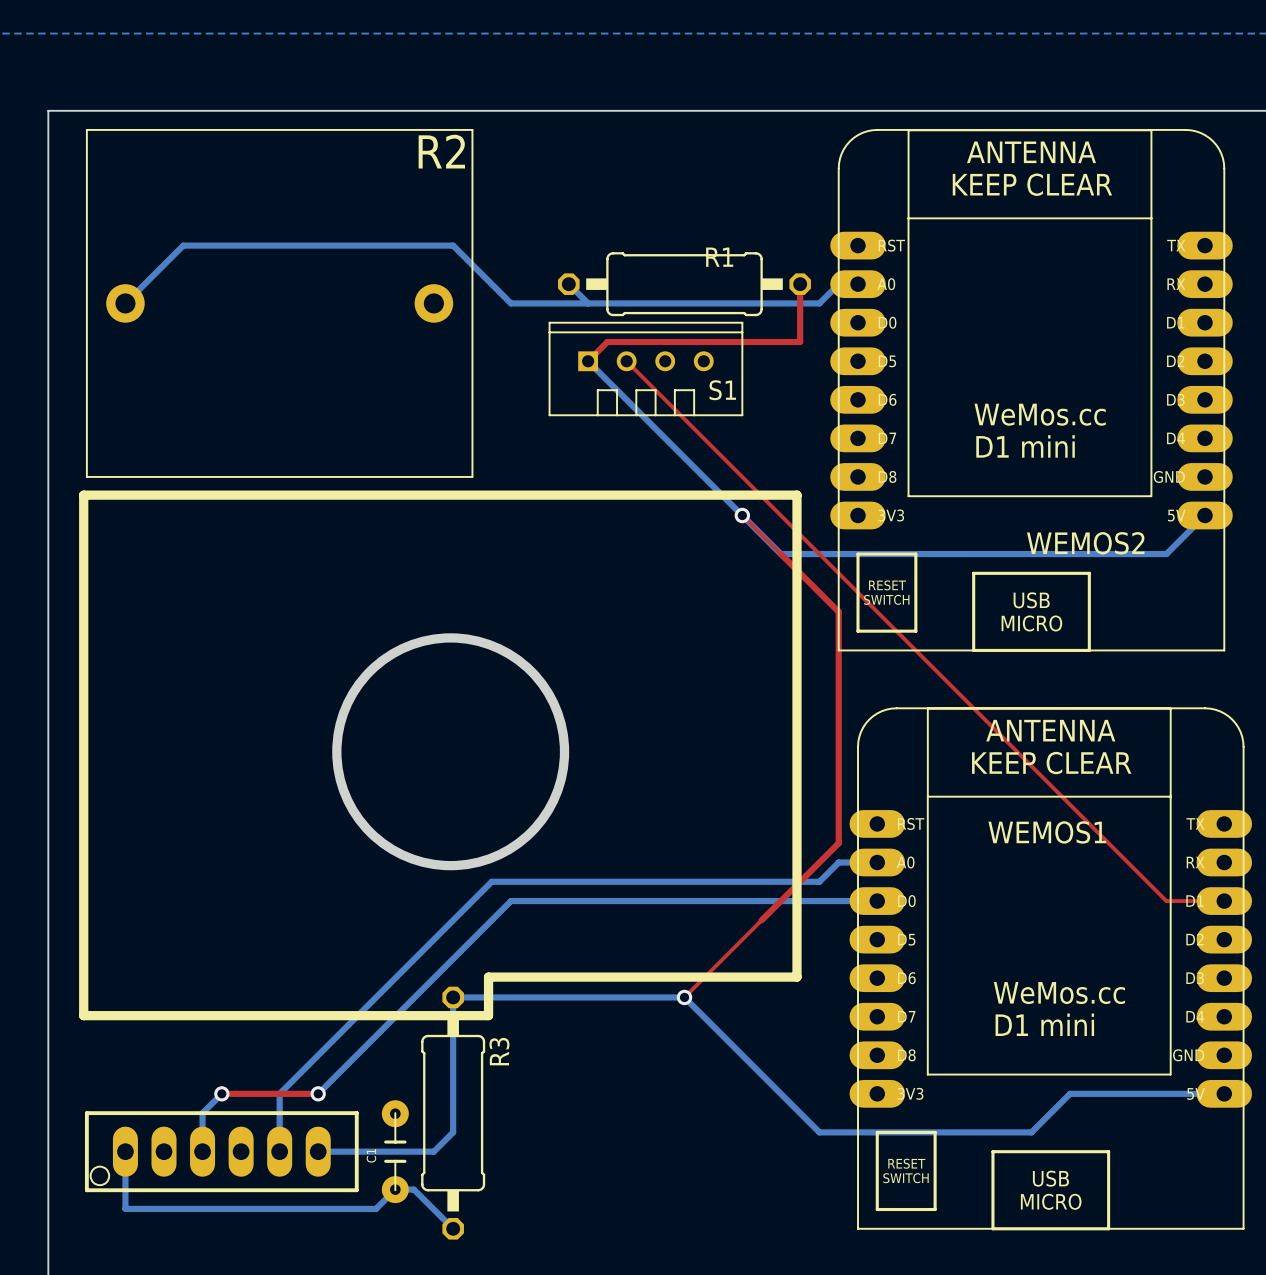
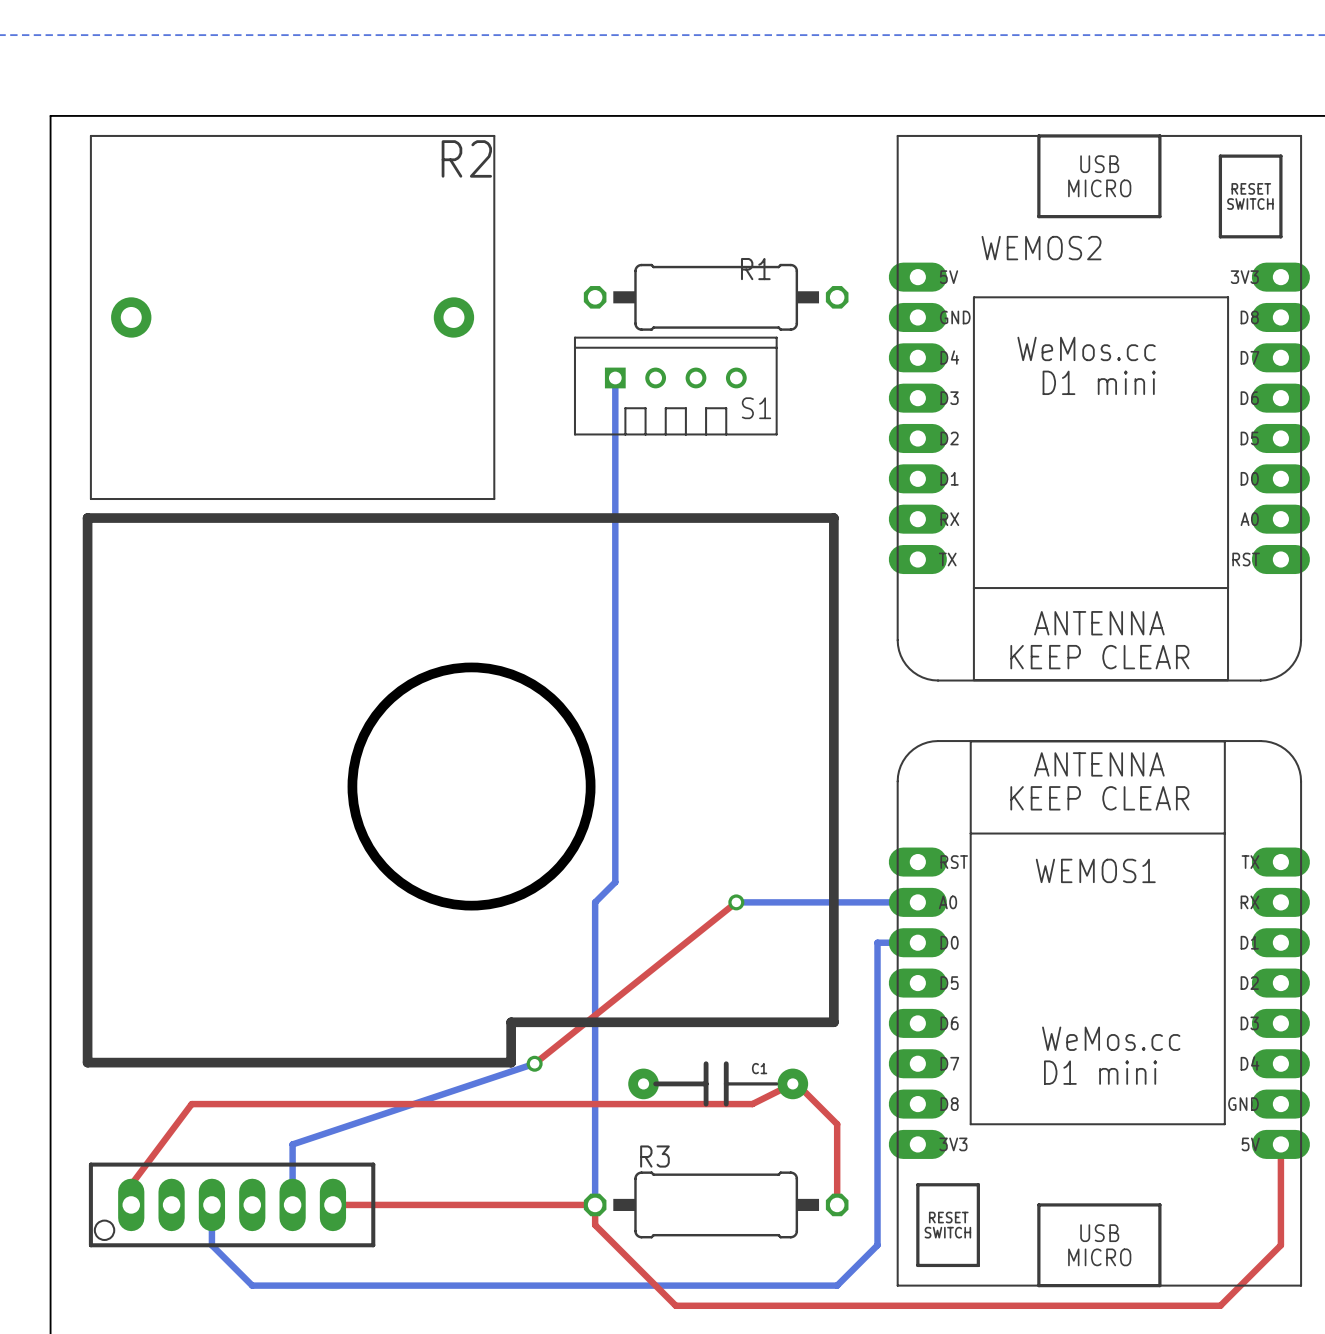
WEMOS2 footprint: [830, 128, 1233, 652] -> [888, 134, 1310, 682]
bottom track: (568, 284) (588, 303) -> none
top track: (800, 284) (800, 342) (607, 342) (588, 361) -> none
bottom track: (858, 284) (838, 284) (819, 303) (511, 303) (453, 245) (183, 245) (125, 303) -> none
bottom track: (588, 361) (780, 554) (1166, 554) (1205, 515) -> (615, 377) (615, 882) (595, 902) (595, 1204)
top track: (626, 361) (1166, 901) (1224, 901) -> none
top track: (742, 515) (838, 611) (838, 843) (684, 997) -> none
via: (742, 515) -> none
WEMOS2 name position: WEMOS2 (1085, 543) -> WEMOS2 (1041, 248)
bottom track: none -> (736, 902) (877, 902)
top track: none -> (736, 902) (534, 1063)
via: none -> (736, 902)
bottom track: (838, 862) (819, 881) (491, 881) (279, 1093) -> (534, 1063) (292, 1144)
bottom track: (838, 901) (511, 901) (318, 1093) -> (877, 942) (877, 1245) (837, 1285) (252, 1285) (211, 1245) (211, 1204)
via: (684, 997) -> none
via: none -> (534, 1063)
top track: none -> (792, 1083) (752, 1104) (191, 1104) (131, 1184) (131, 1204)
top track: none -> (796, 1083) (837, 1124) (837, 1204)
R3 name position: R3 (499, 1051) -> R3 (654, 1156)
bottom track: (221, 1093) (202, 1113) (202, 1151) -> none
top track: (221, 1093) (318, 1093) -> none
via: (221, 1093) -> none
via: (318, 1093) -> none
bottom track: (1224, 1093) (1070, 1093) (1031, 1132) (819, 1132) (684, 997) (453, 997) (453, 1132) (433, 1151) (318, 1151) -> none
top track: none -> (1280, 1144) (1280, 1245) (1220, 1305) (675, 1305) (595, 1225) (595, 1204) (332, 1204)
C1 footprint: [381, 1100, 409, 1204] -> [628, 1061, 809, 1107]
R3 rotation: 0° (453, 1113) -> 90° clockwise (716, 1204)
R3 position: (453, 1113) -> (716, 1204)
bottom track: (125, 1151) (125, 1208) (376, 1208) (395, 1189) (414, 1189) (453, 1228) -> none
C1 name position: C1 (371, 1155) -> C1 (759, 1068)

